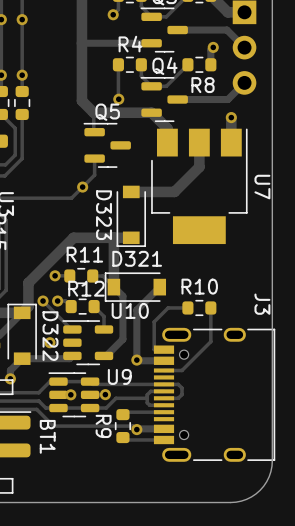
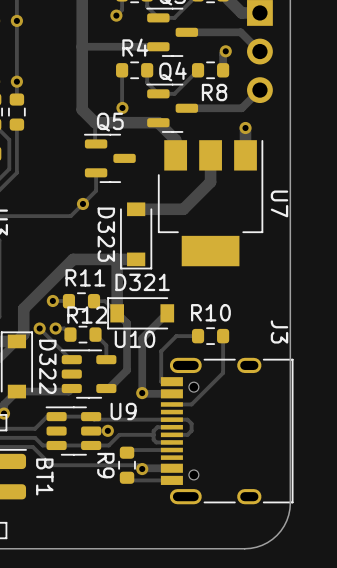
via: (49, 342) -> none
via: (70, 394) -> none

